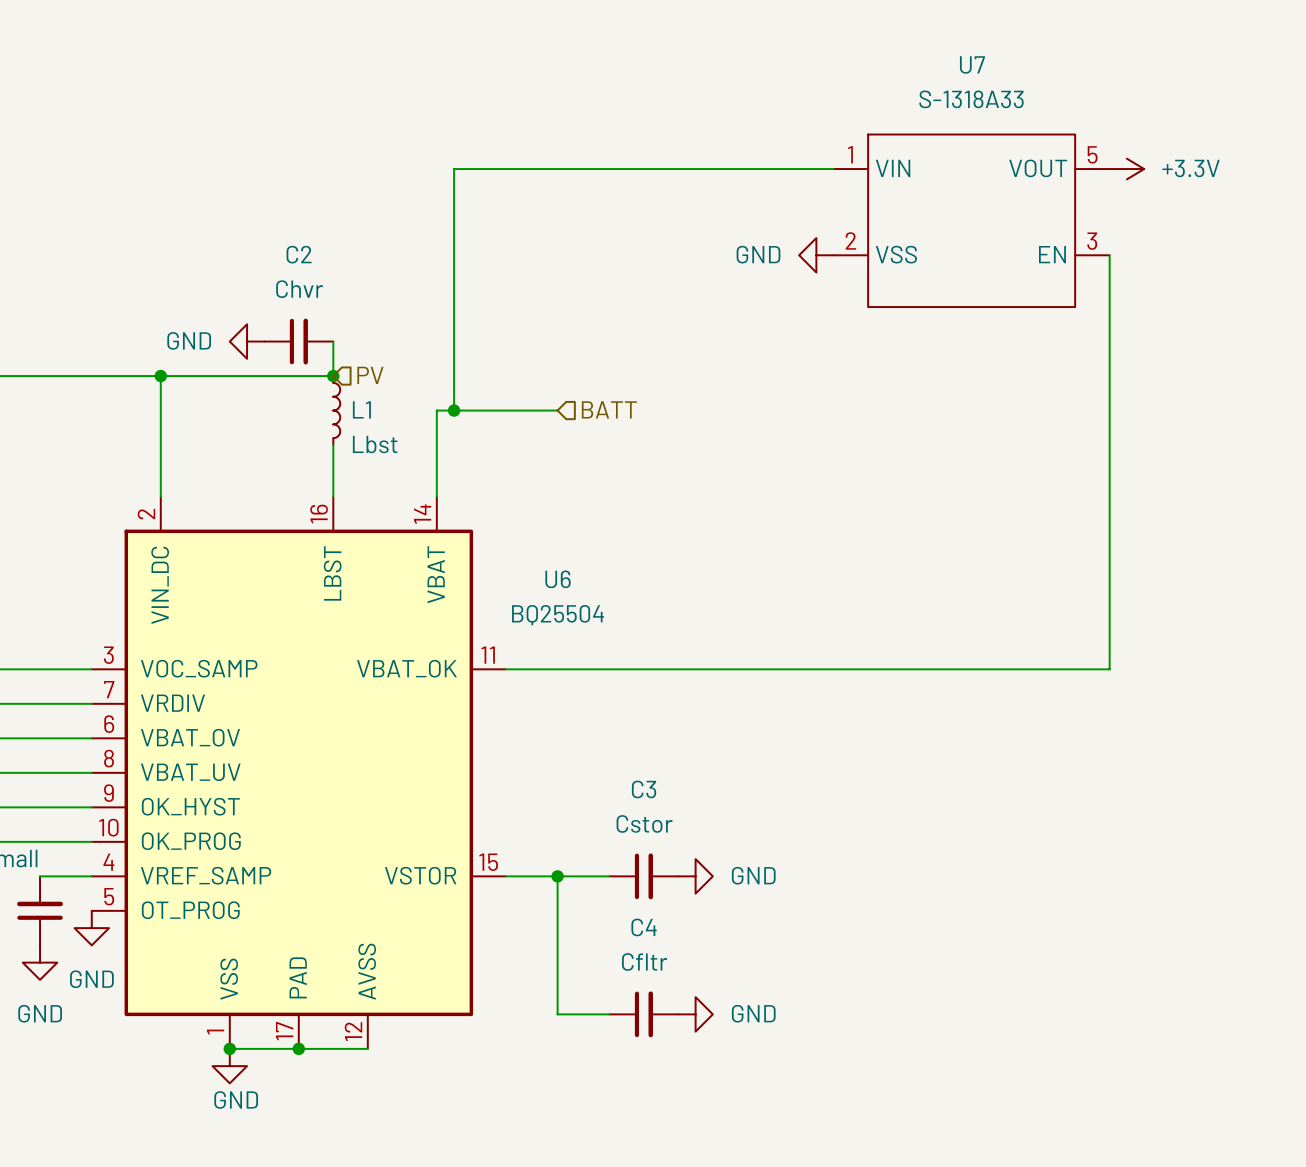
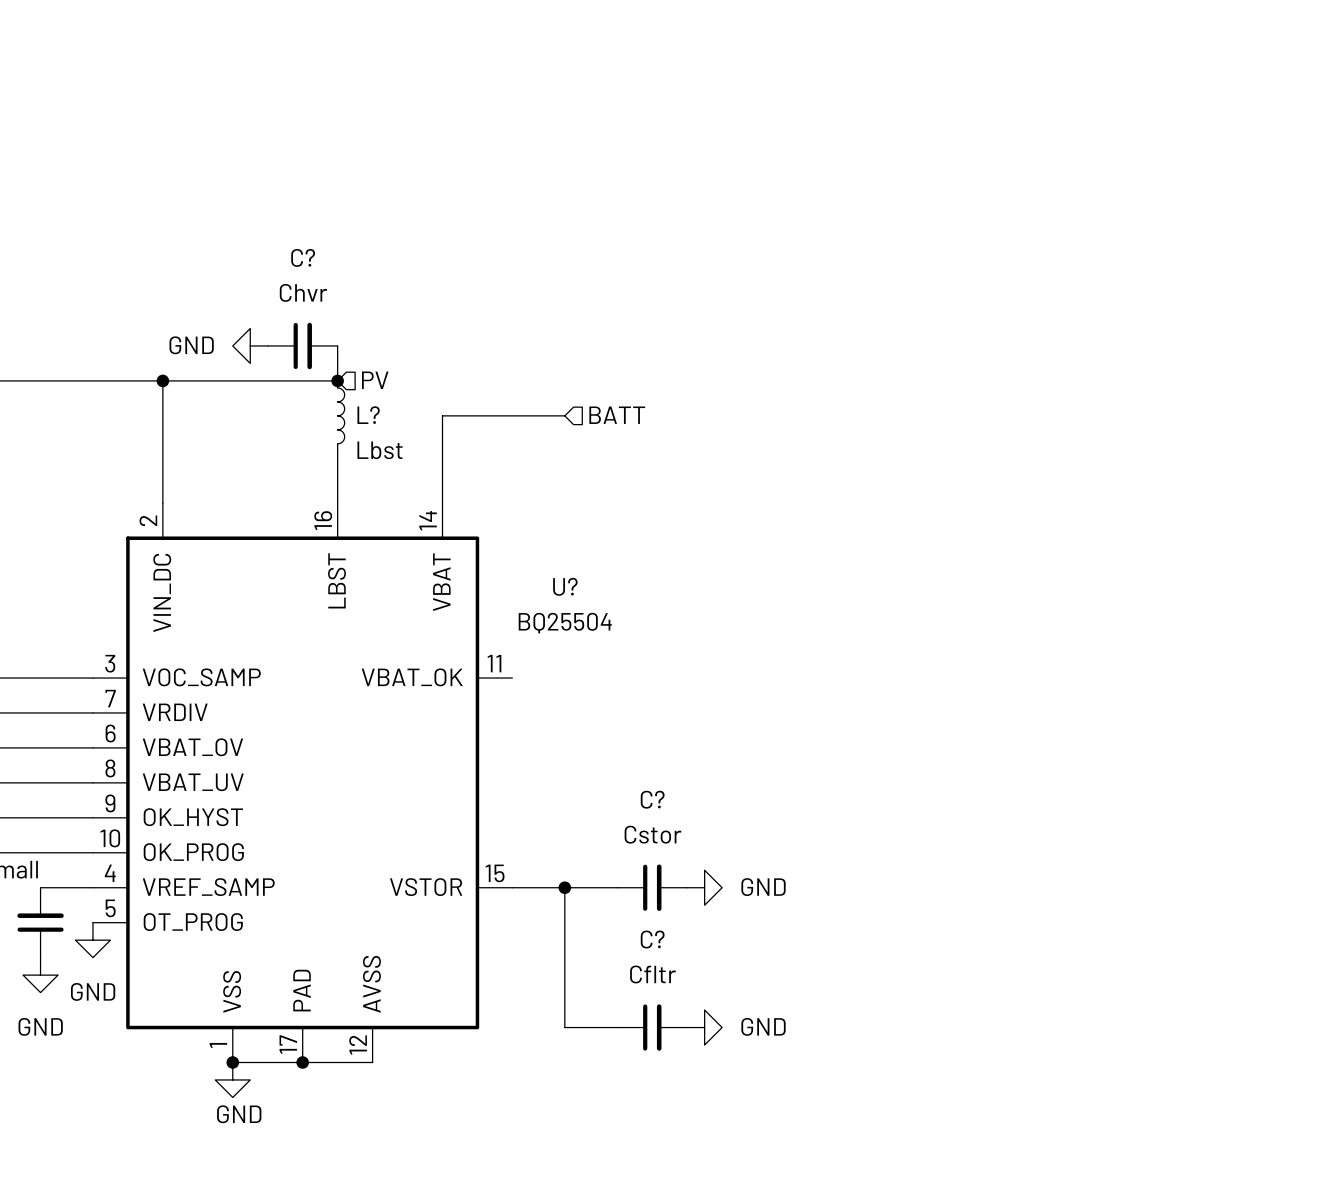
wire: (833, 169) (454, 169) (454, 410) -> none
power symbol: +3.3V (1126, 169) -> none
U7: S-1318A33 (971, 220) -> none
C2 name: C2 (299, 254) -> C? (303, 257)
power symbol: GND (816, 255) -> none
wire: (1109, 255) (1109, 669) (505, 669) -> none
L1 name: L1 (361, 409) -> L? (368, 415)
junction: (454, 410) -> none
U6 name: U6 (558, 579) -> U? (565, 586)
C3 name: C3 (644, 789) -> C? (652, 799)
C4 name: C4 (644, 927) -> C? (652, 939)

